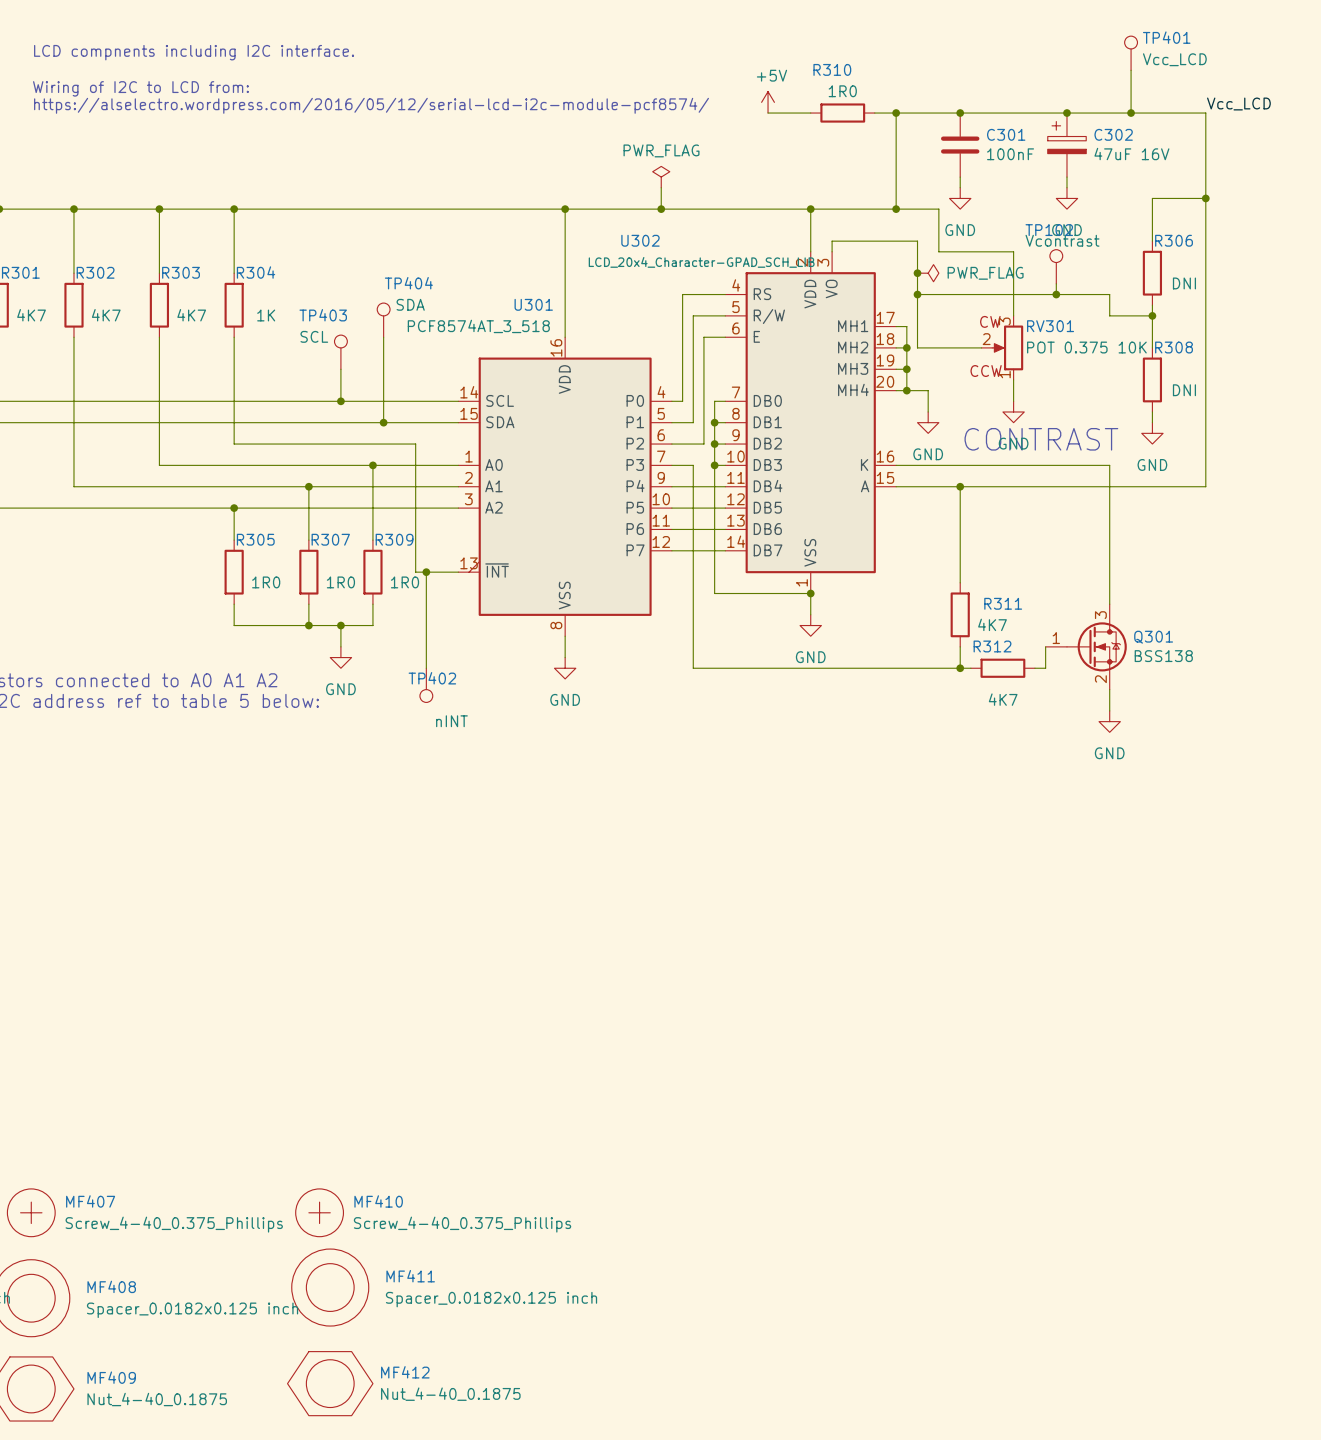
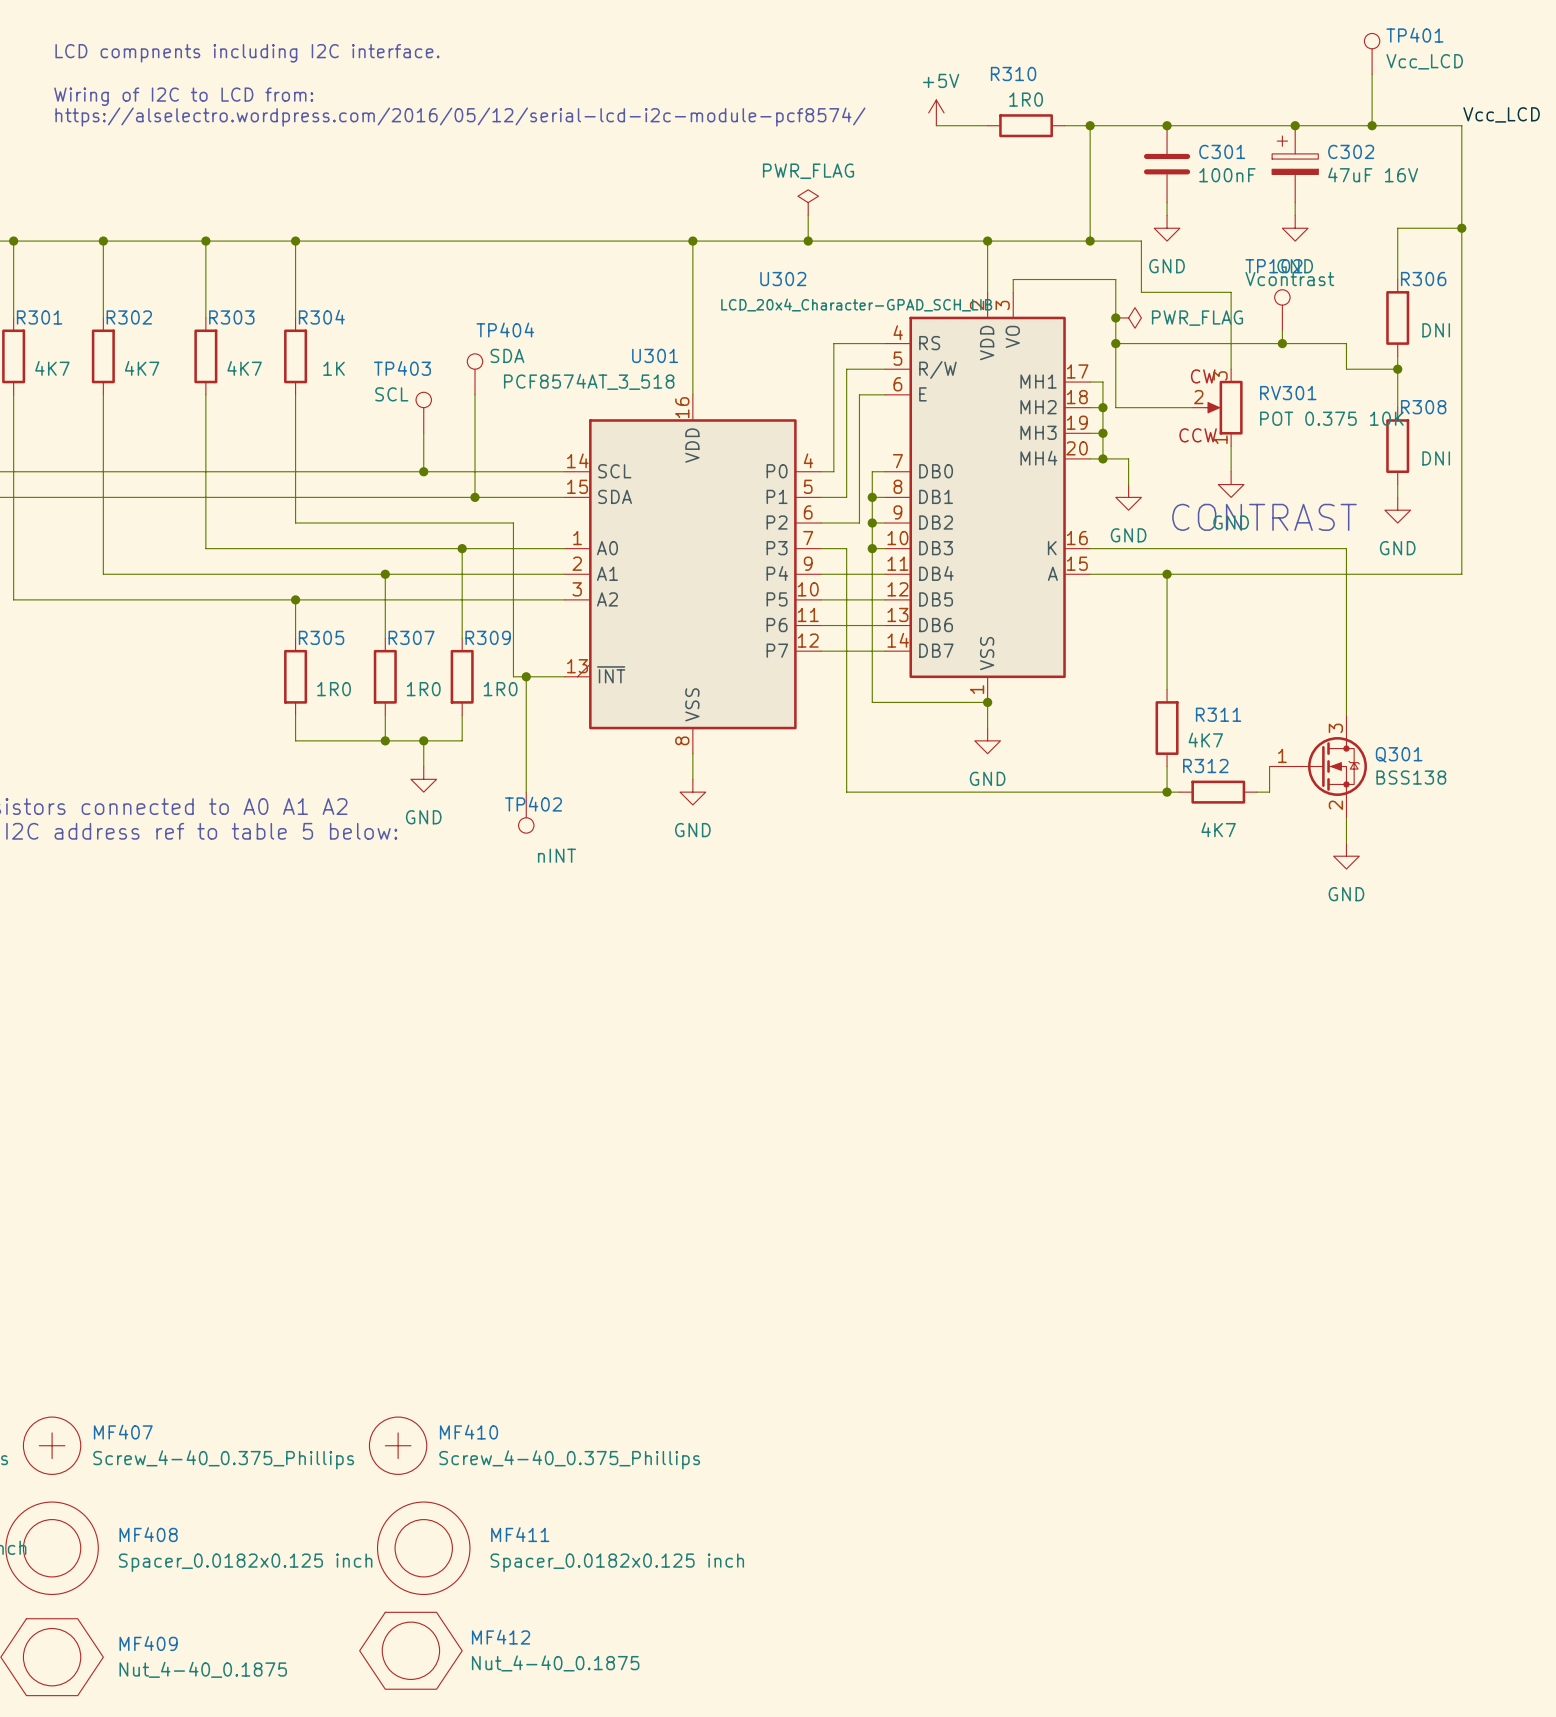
RV301 name position: RV301 (1050, 326) -> RV301 (1288, 393)
RV301 value position: POT 0.375 10K (1086, 347) -> POT 0.375 10K (1331, 418)
MF411 position: (330, 1287) -> (423, 1548)

